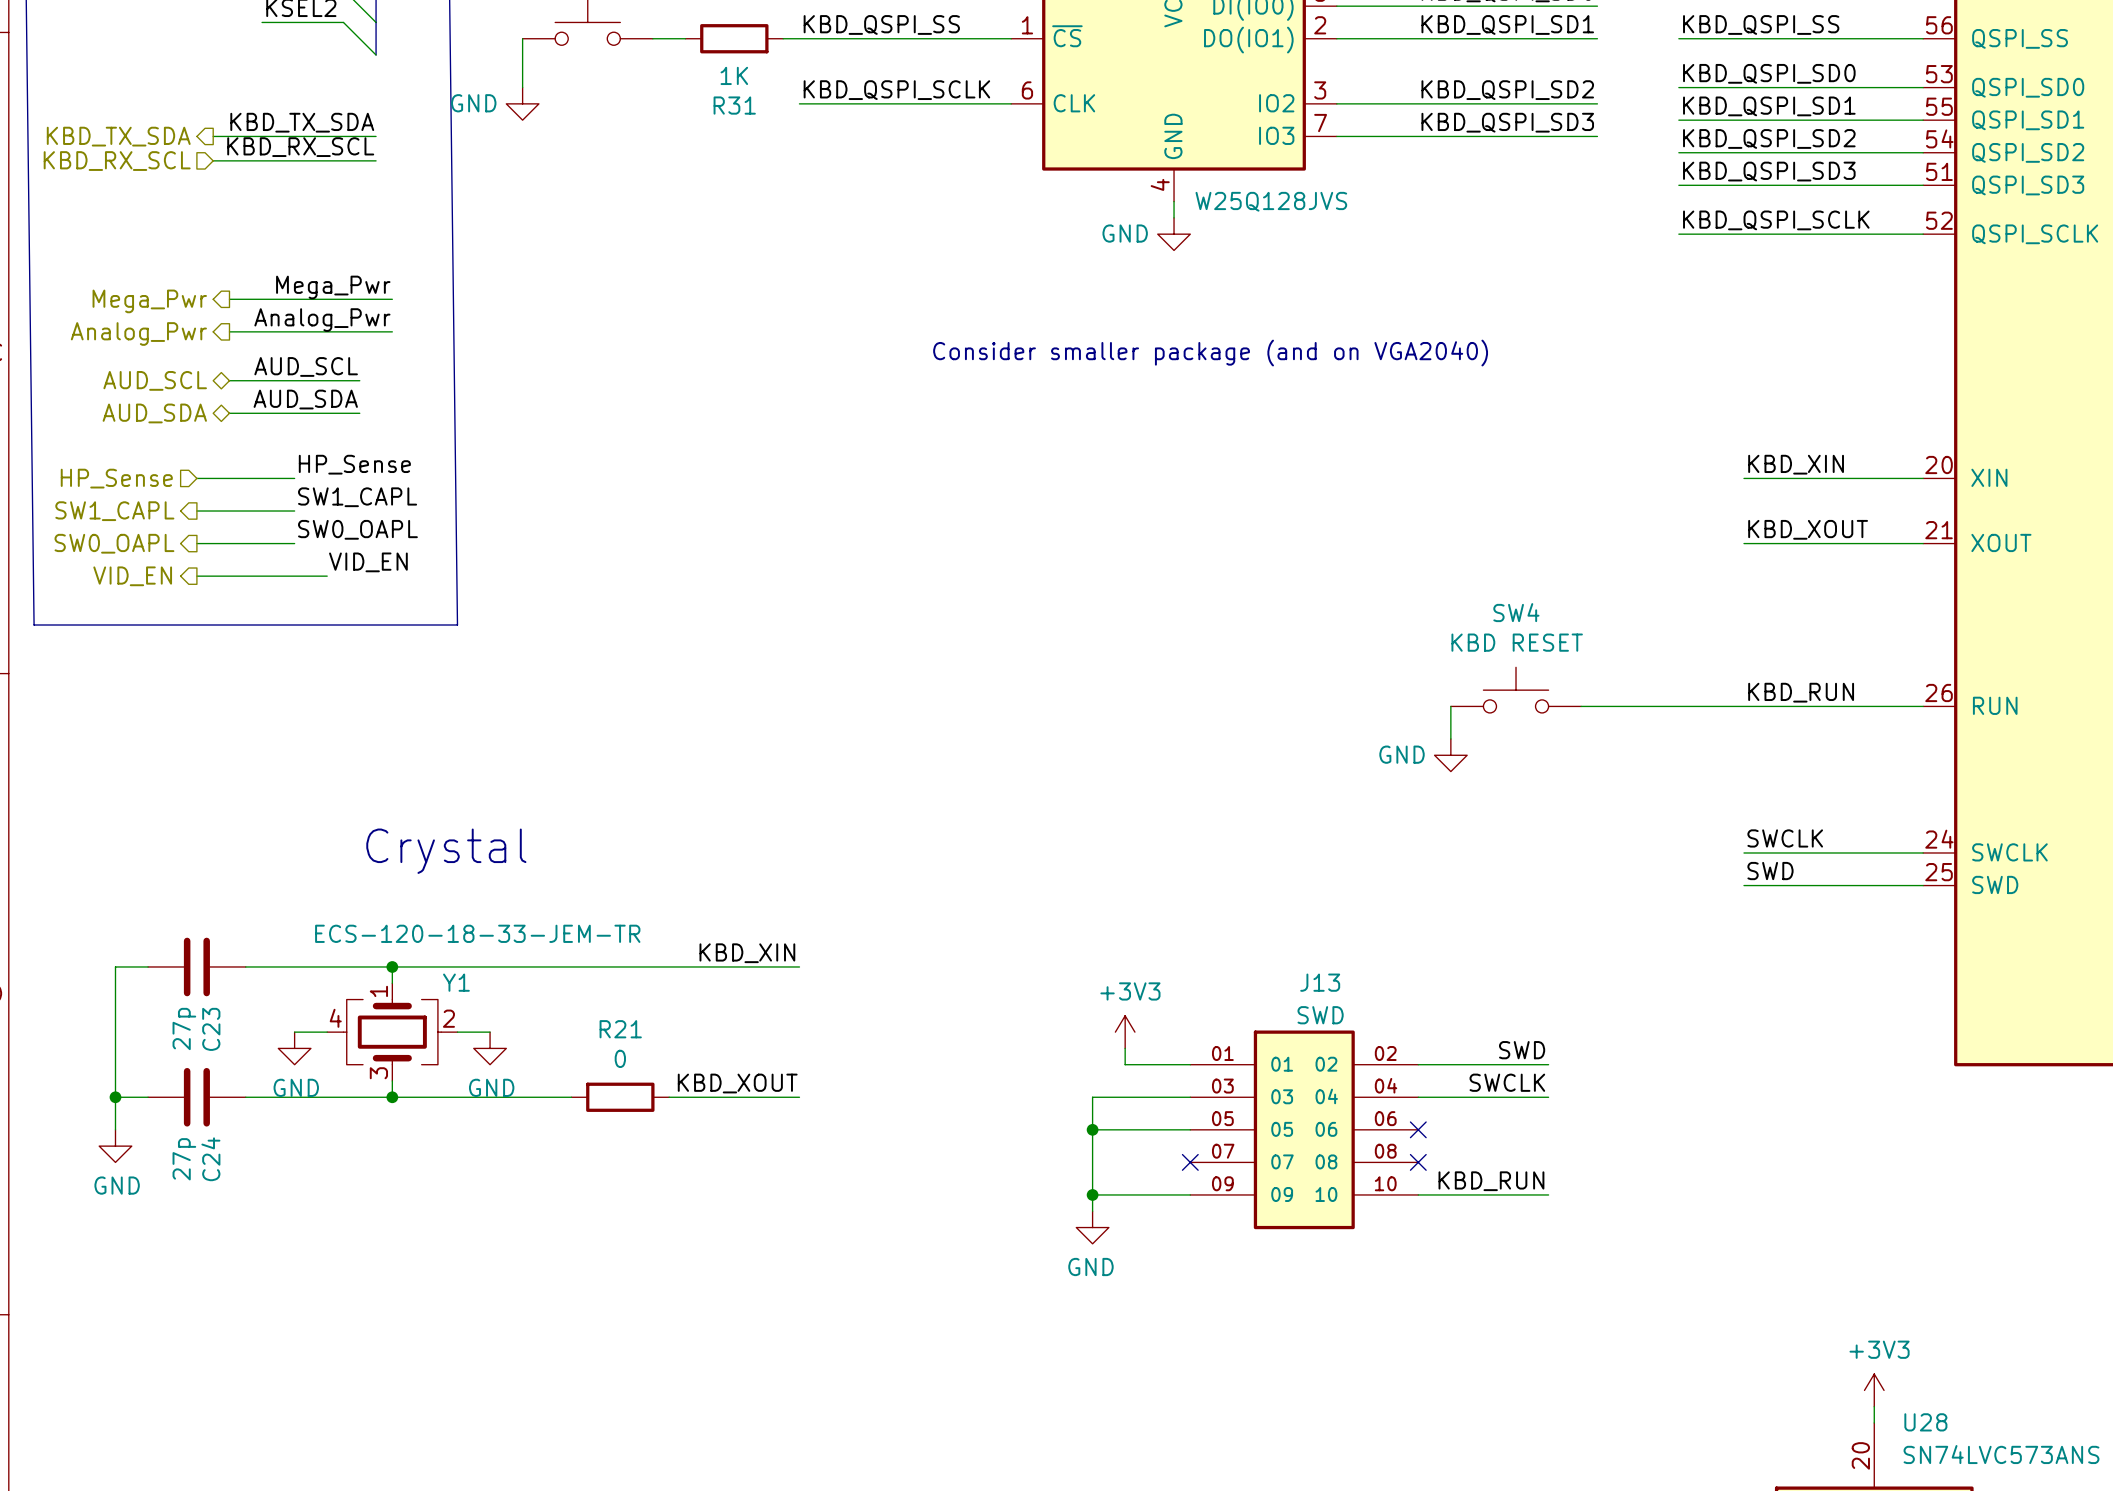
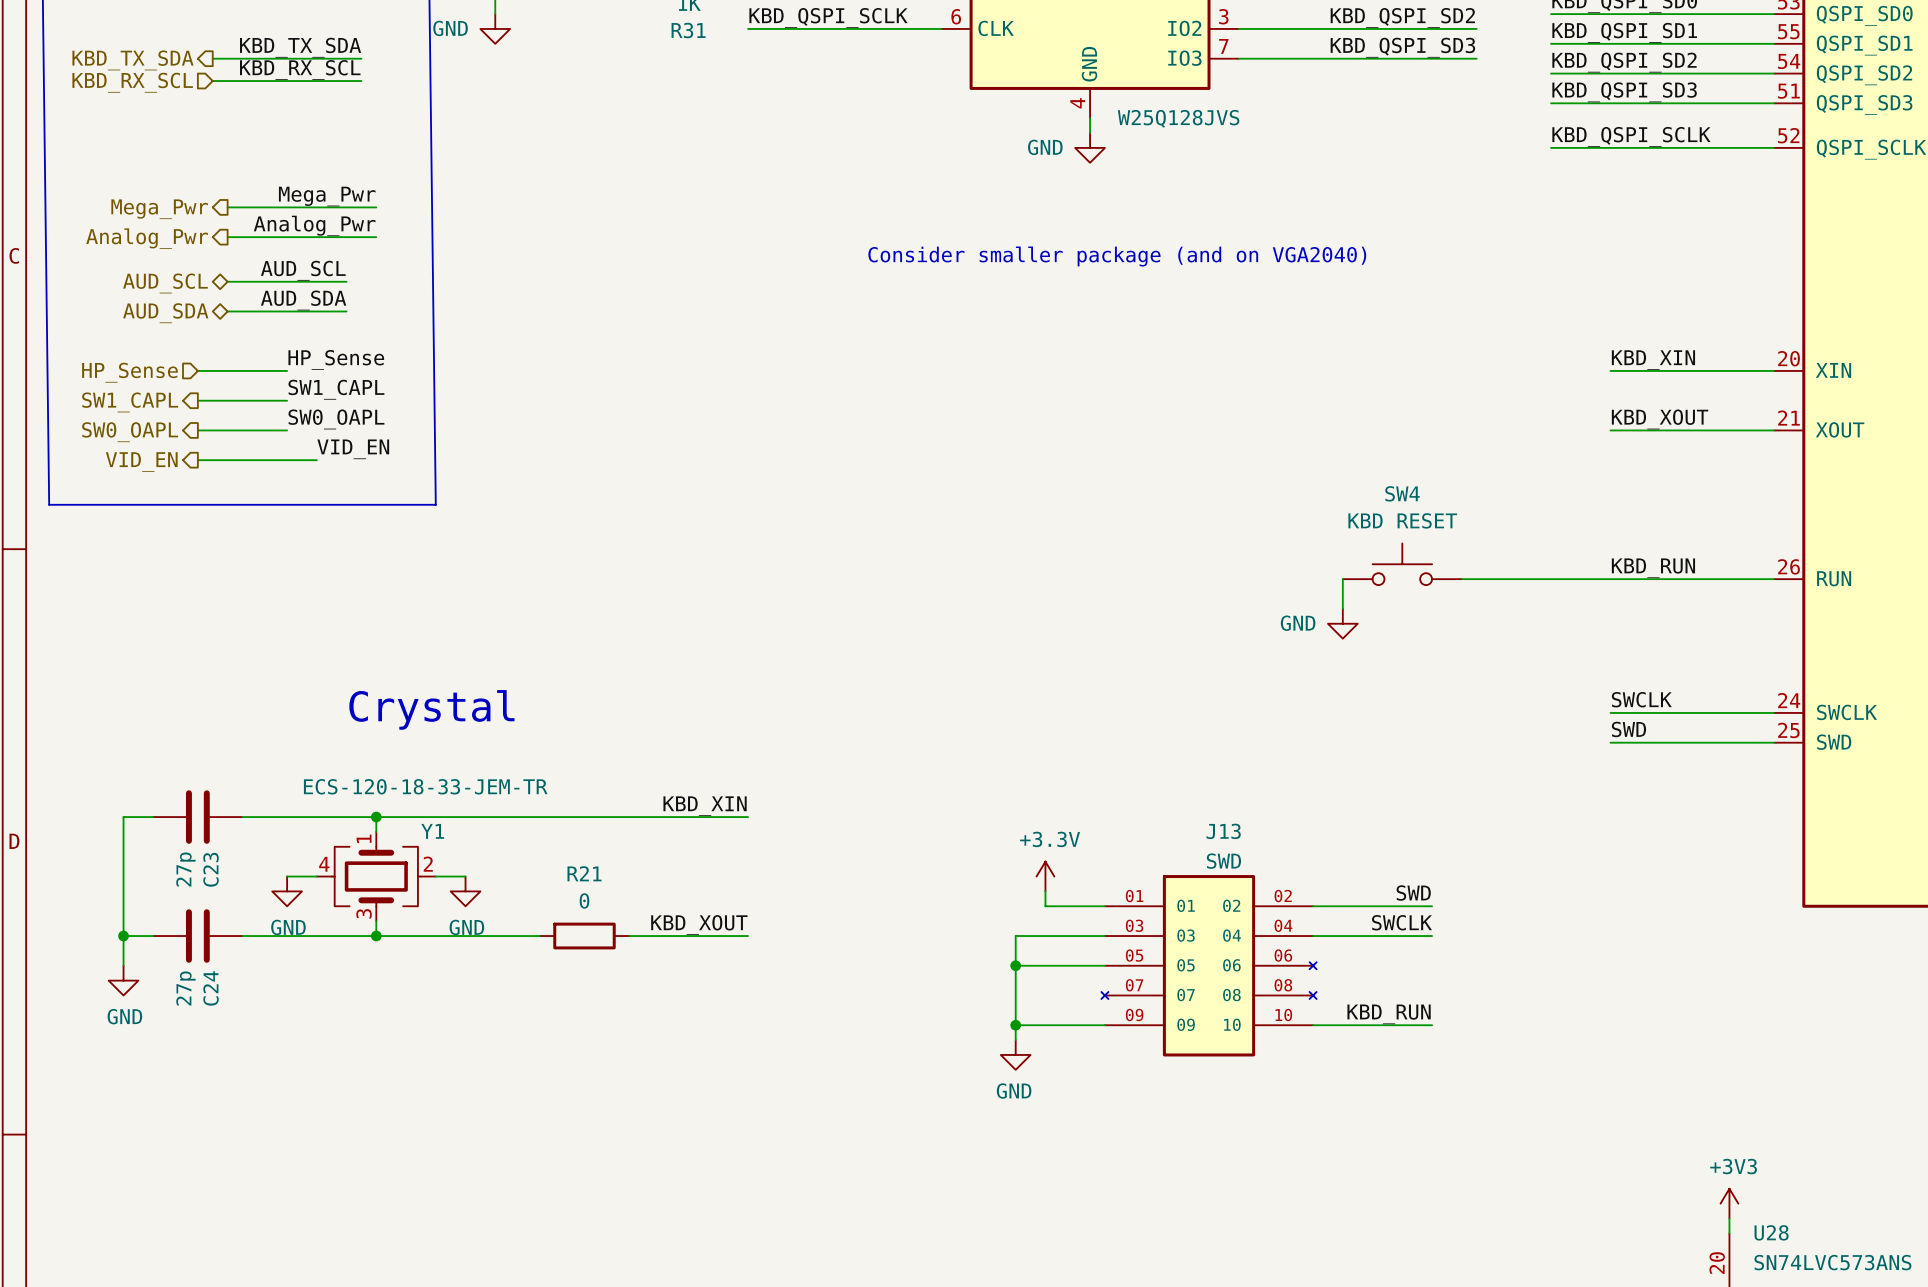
J13 symbol: [1190, 1030, 1419, 1230] -> [1101, 875, 1317, 1057]
power symbol: +3V3 (1125, 1032) -> +3.3V (1045, 876)
no-connect mark: (1418, 1129) -> none
no-connect mark: (1190, 1162) -> none
no-connect mark: (1418, 1162) -> none

